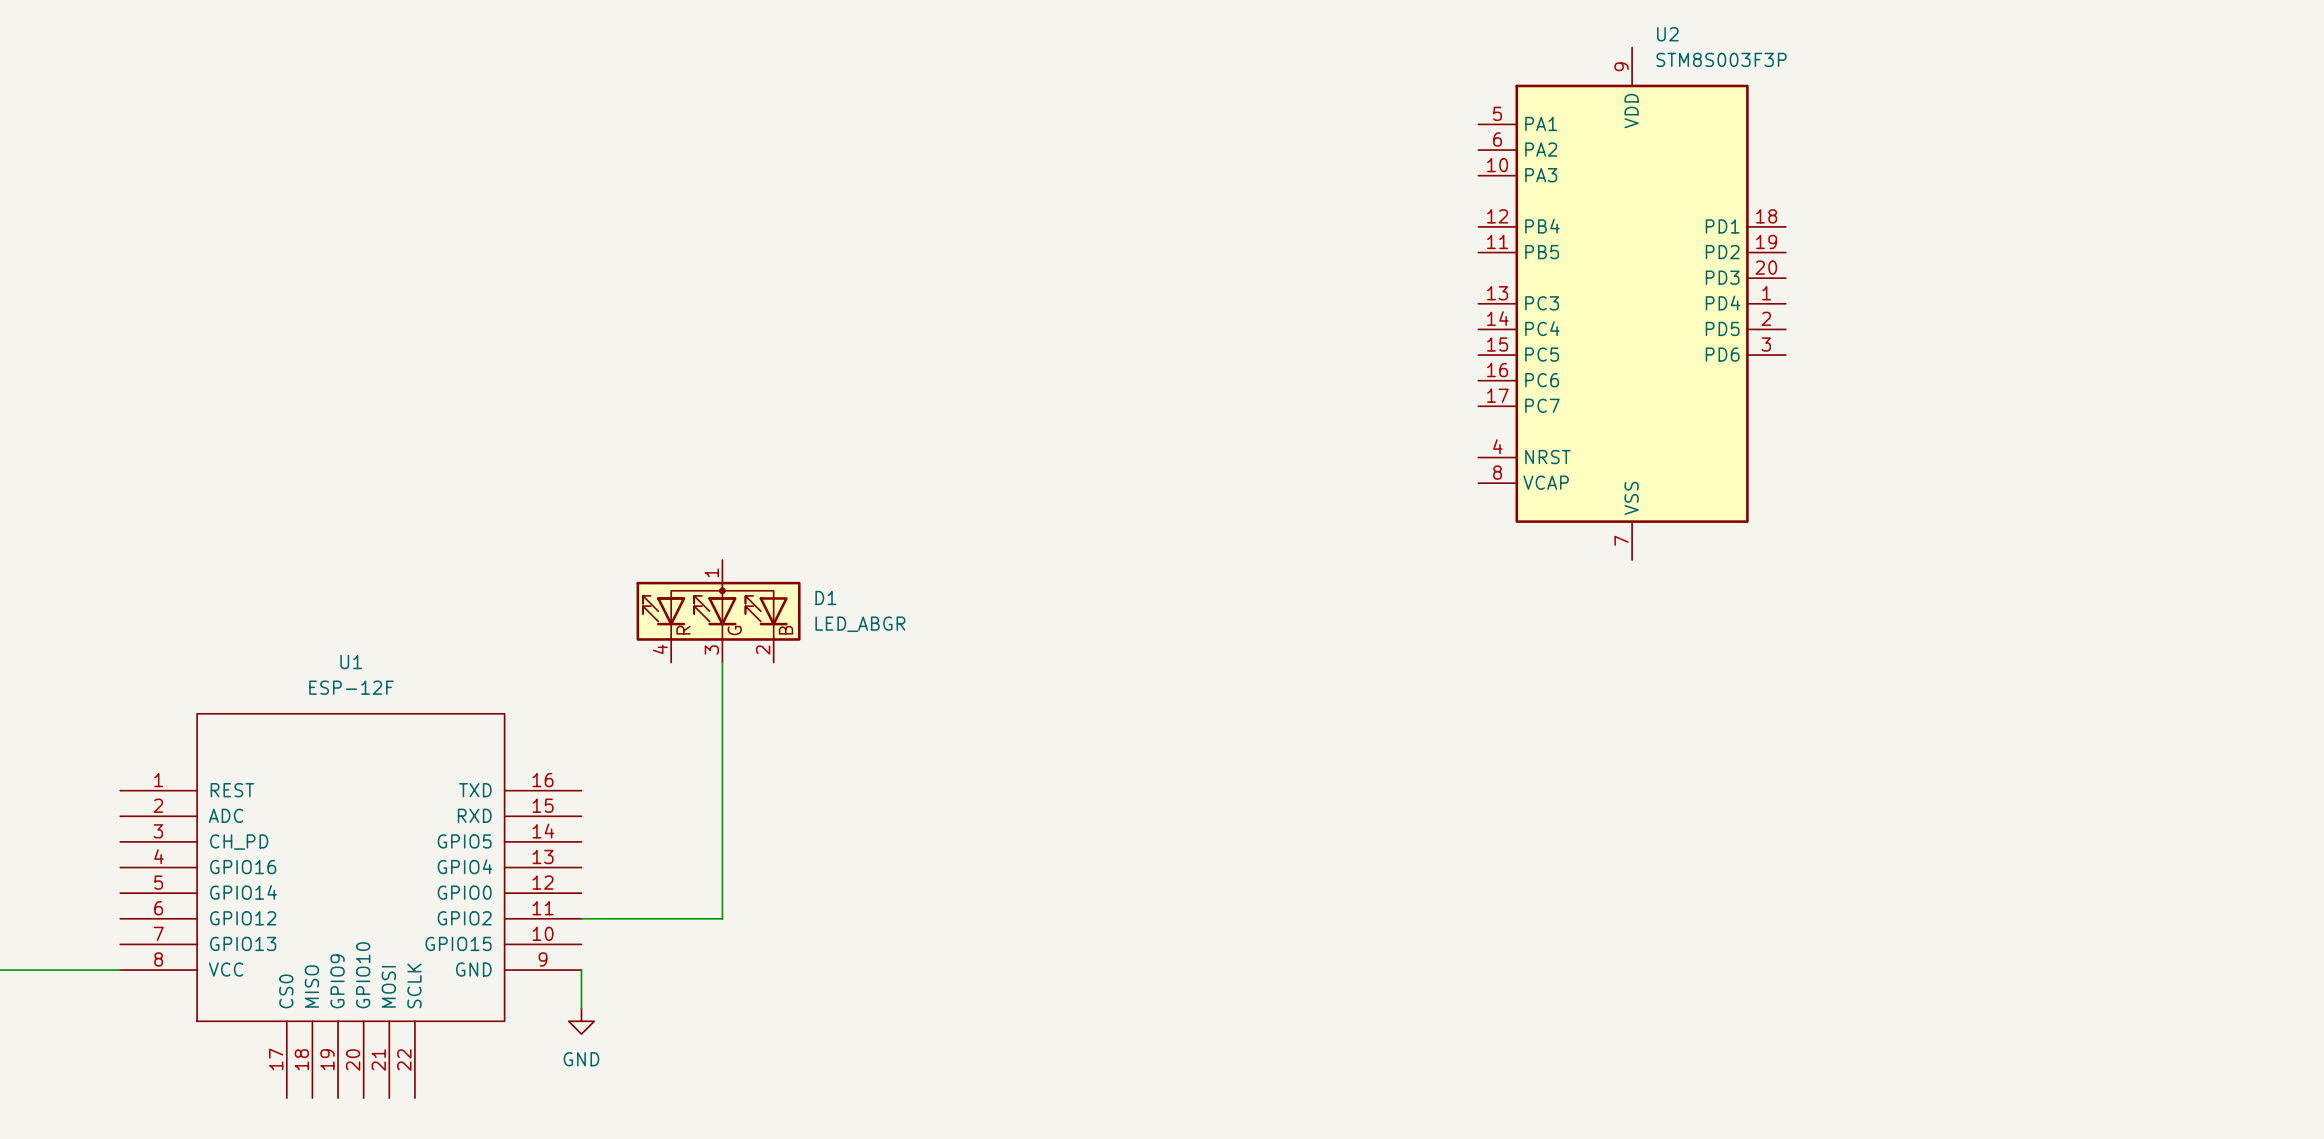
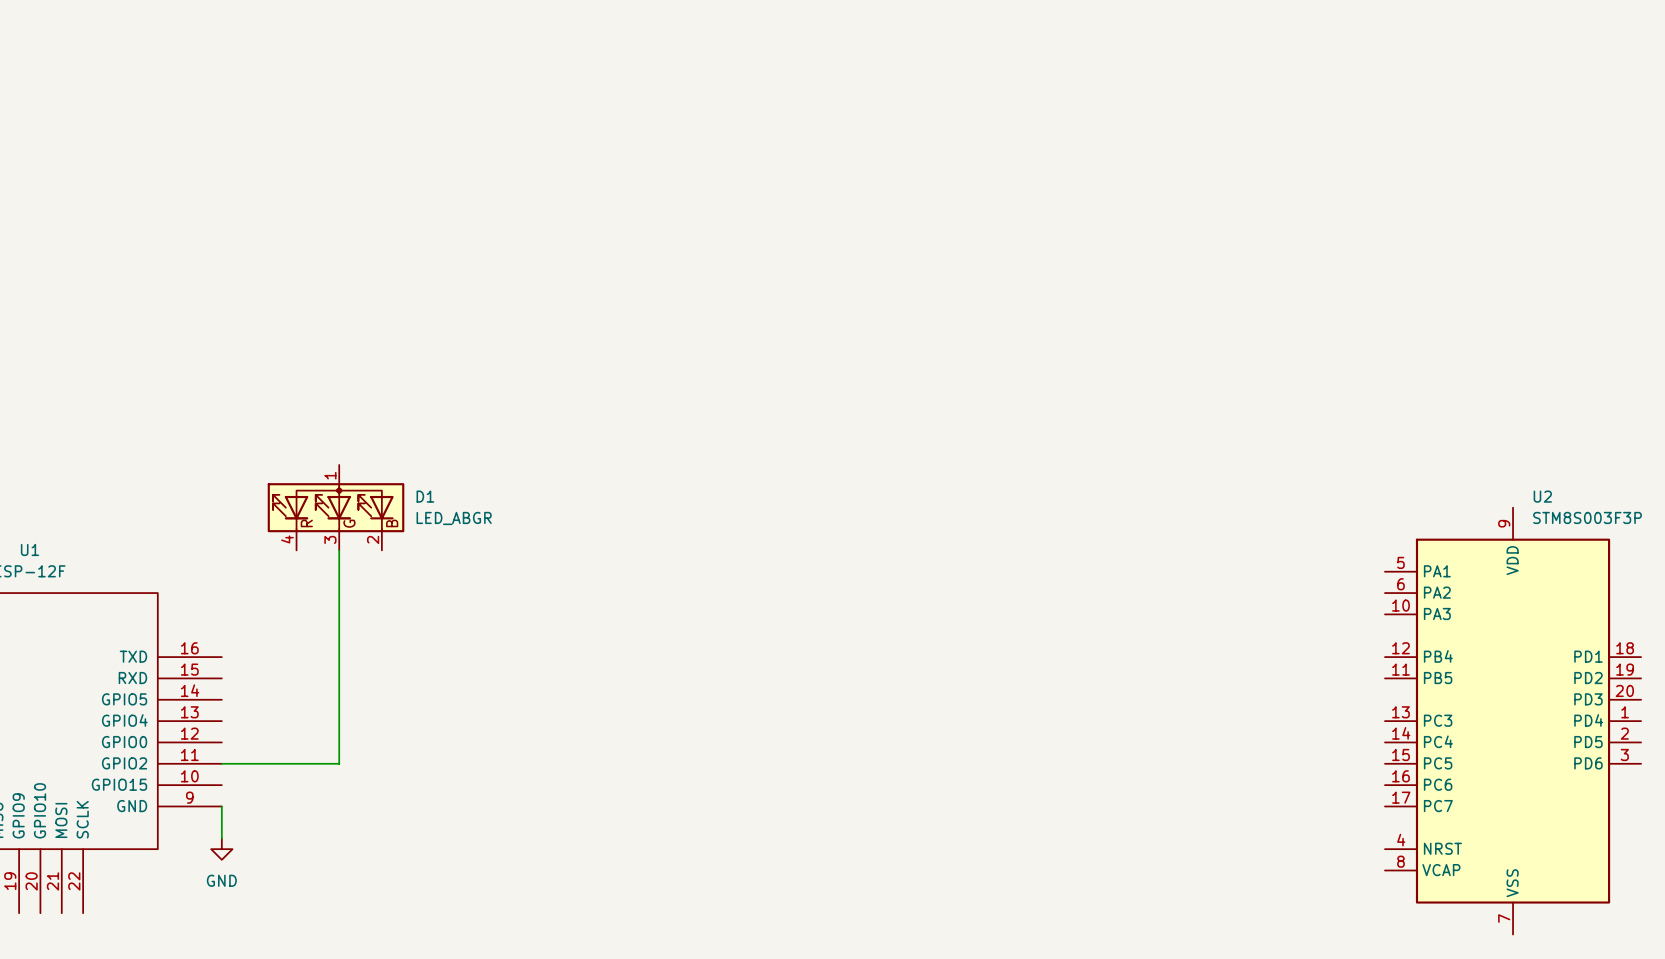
U2 position: (1632, 303) -> (1513, 721)

